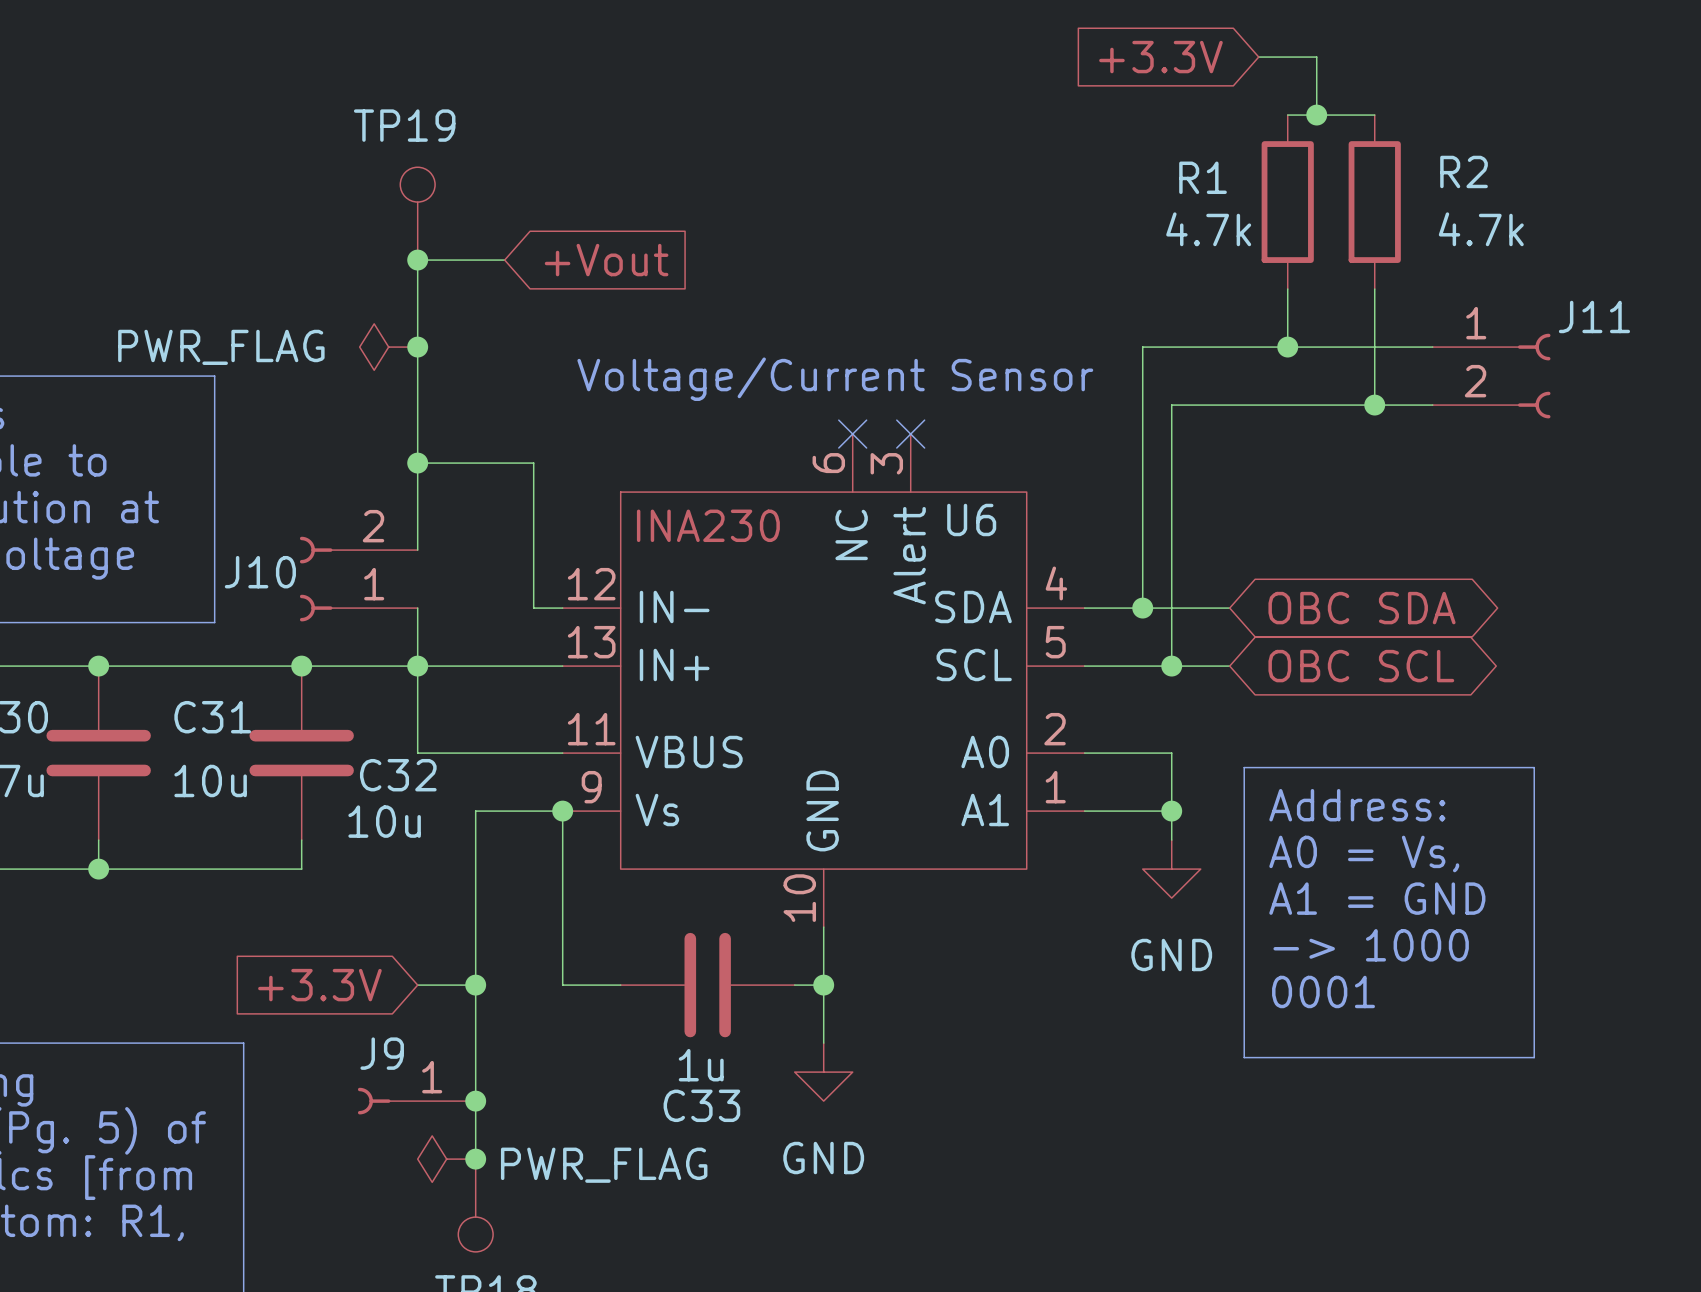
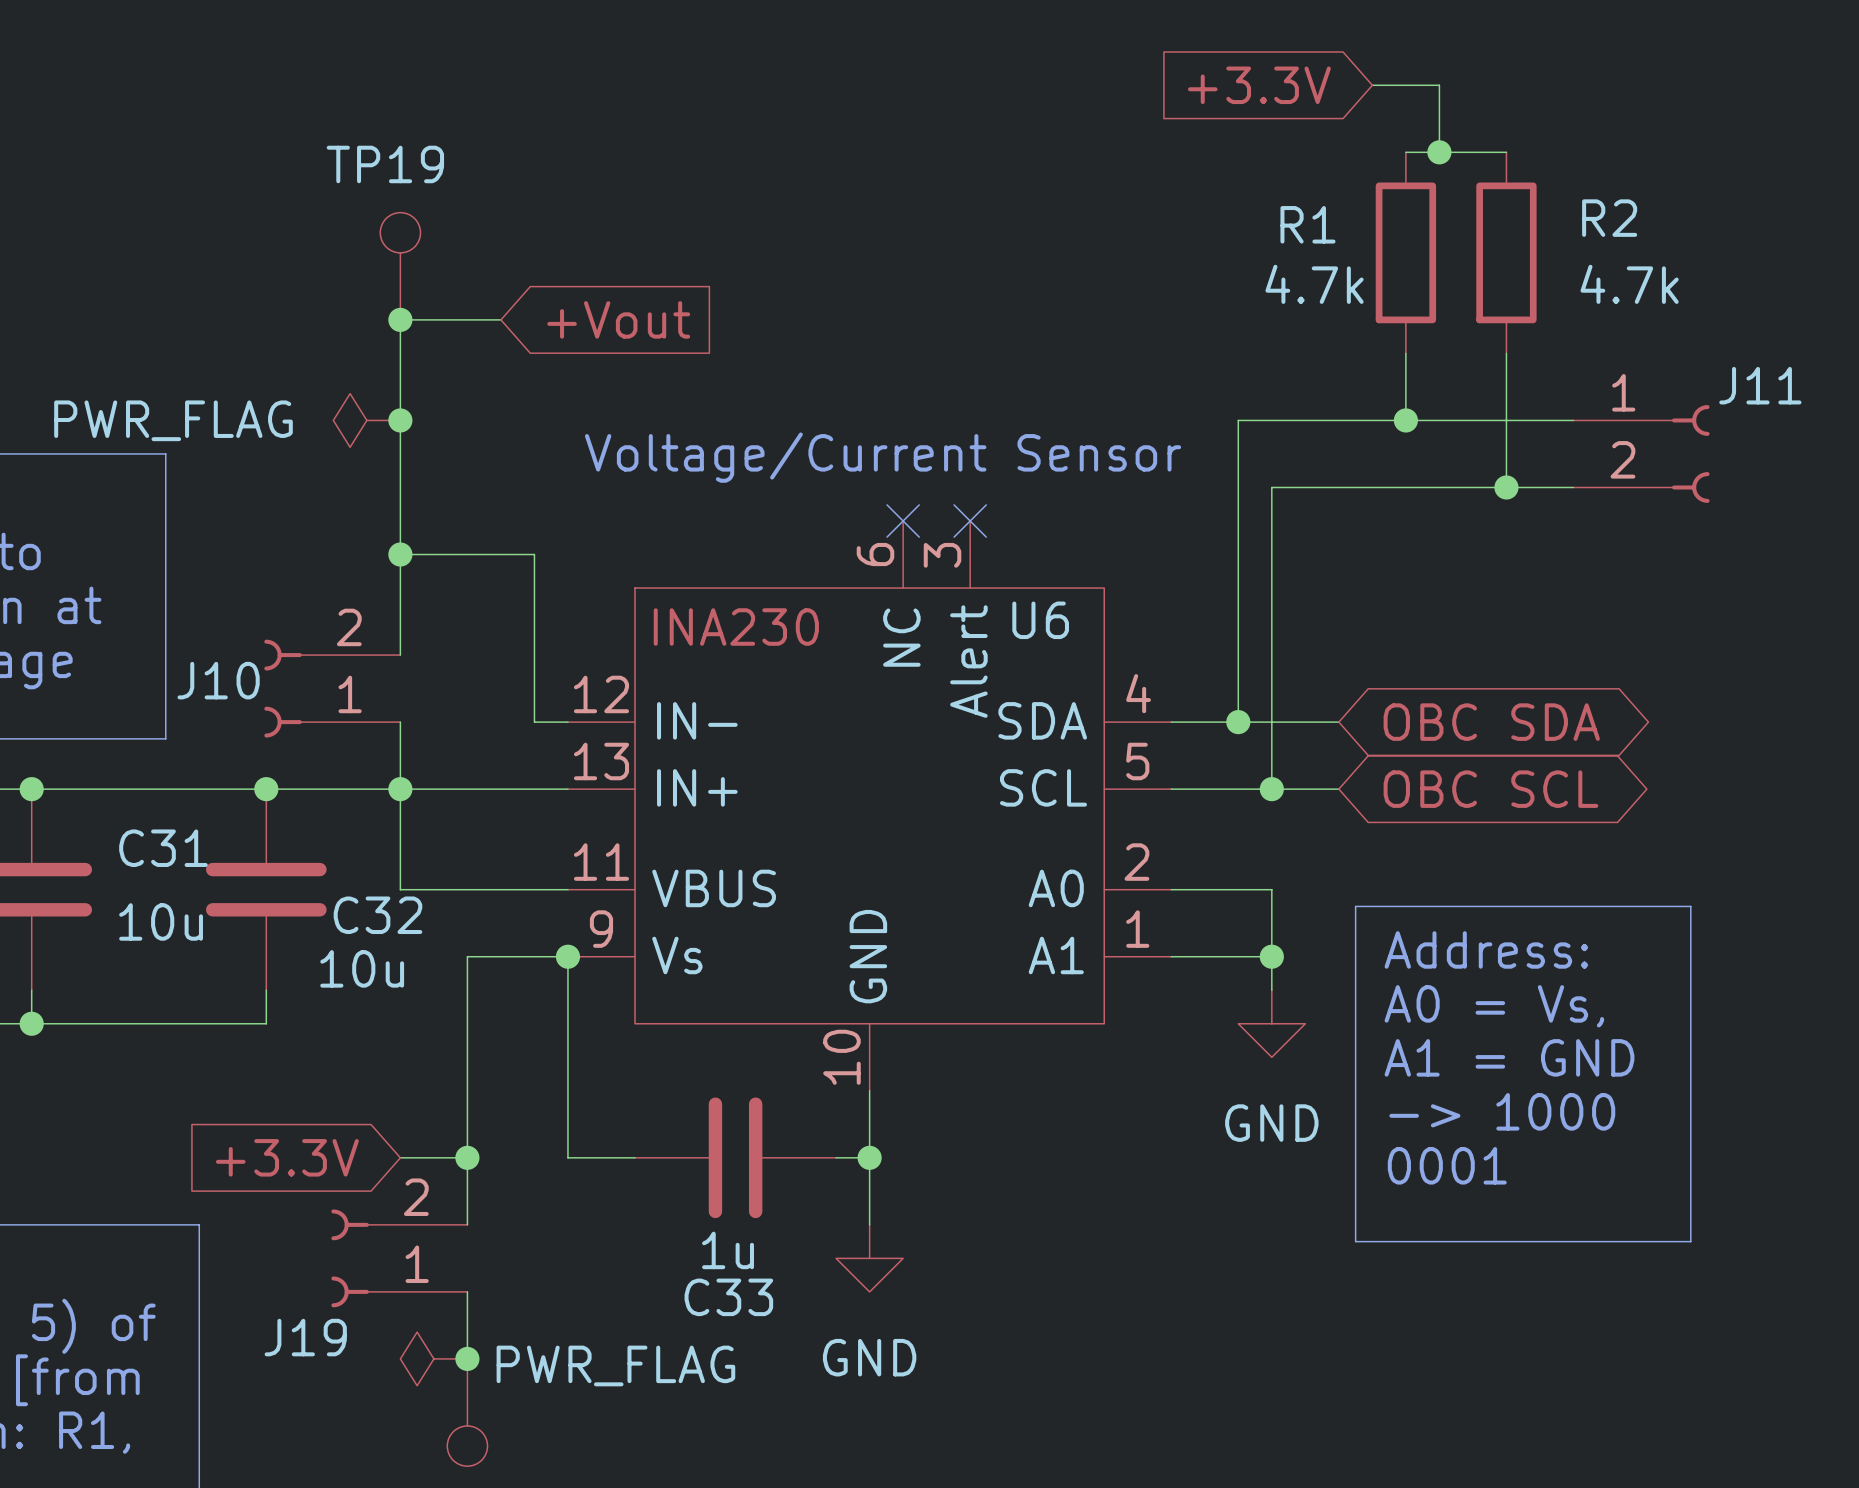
wire: (475, 1043) (475, 1101) -> none
J19: none -> (399, 1258)
J9: (416, 1101) -> none
junction: (475, 1101) -> none

